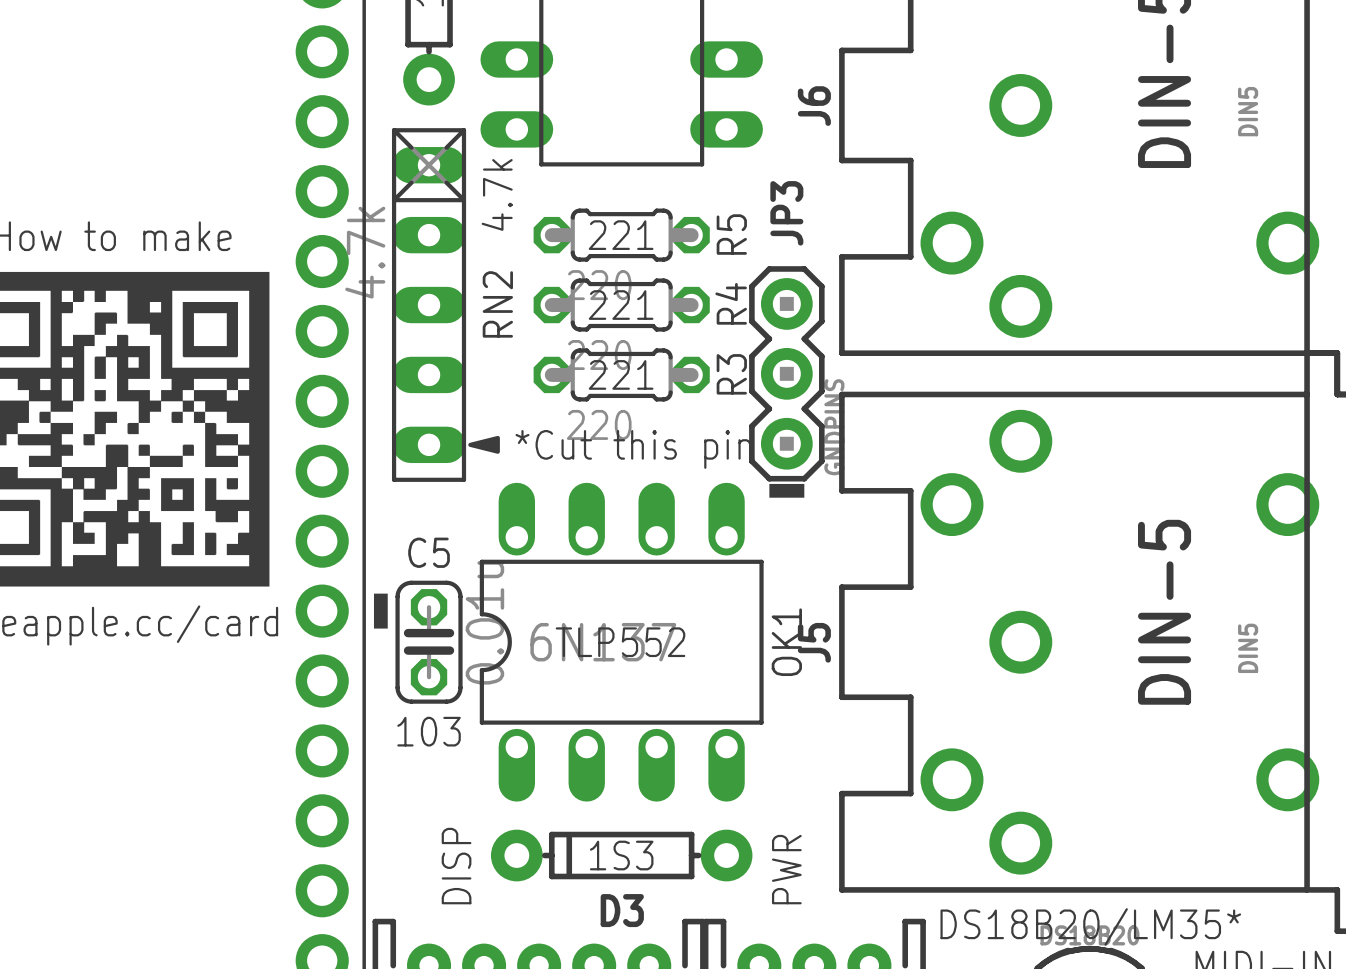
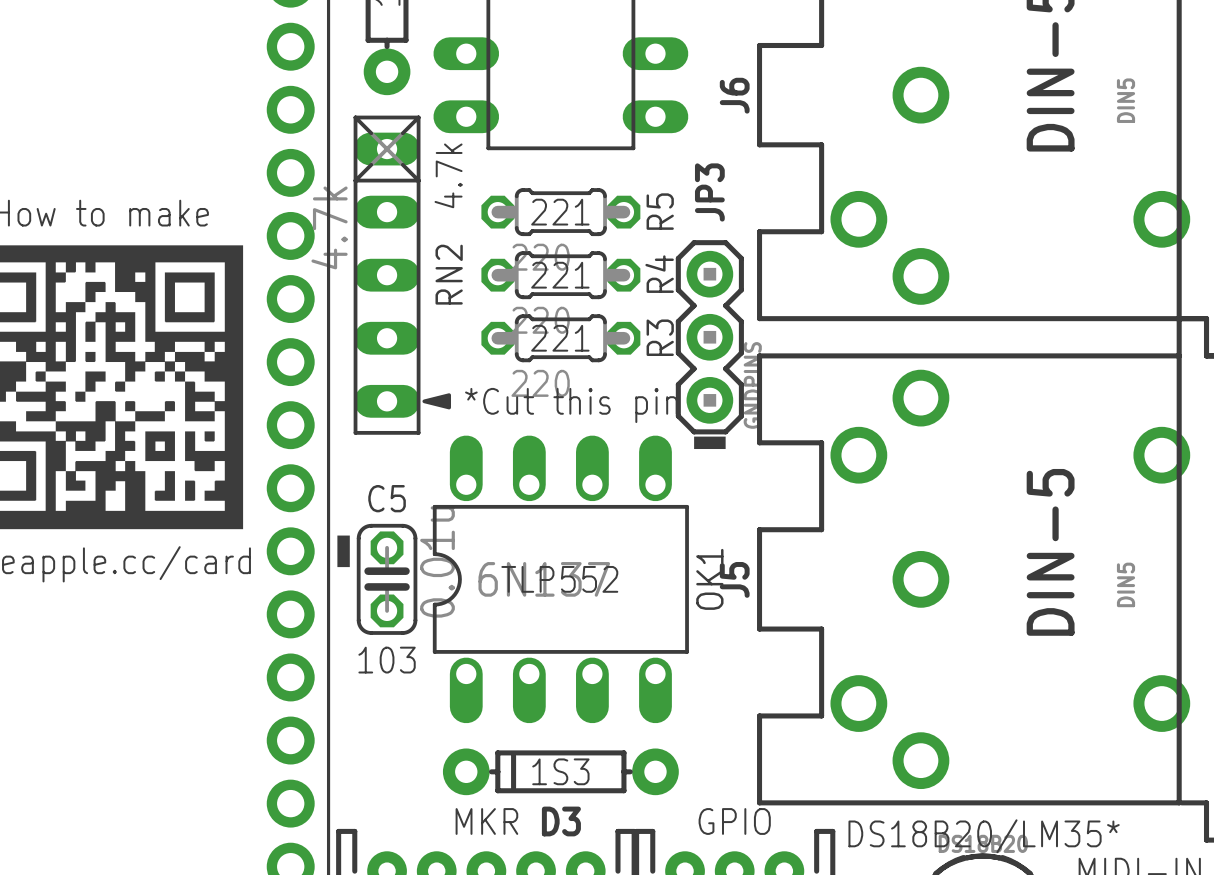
text: DISP (456, 866) -> none
text: PWR (786, 869) -> none
text: none -> MKR (486, 821)
text: none -> GPIO (734, 821)

